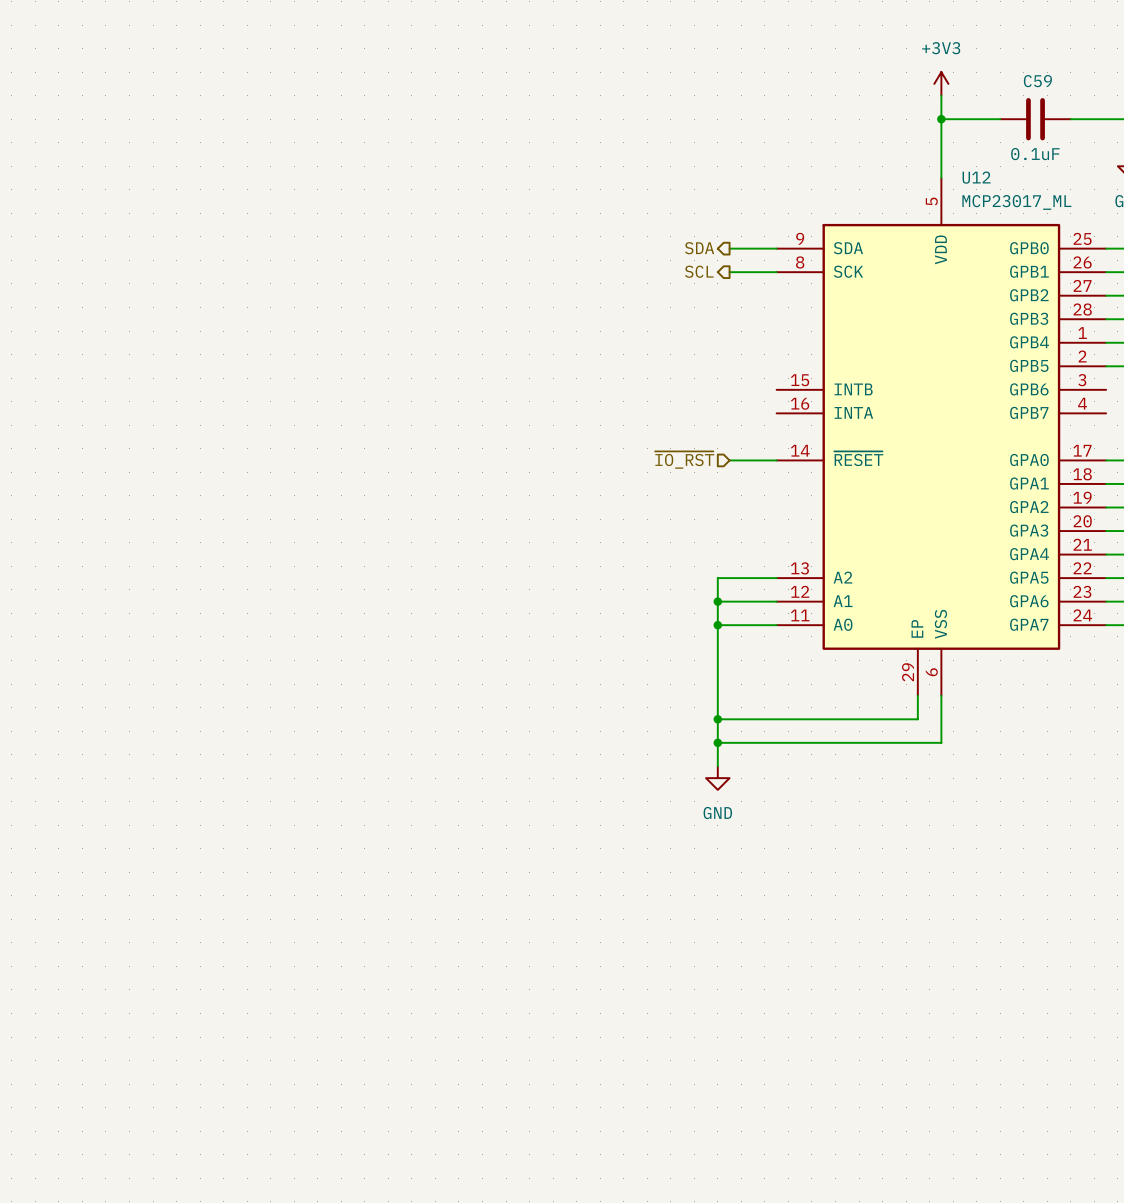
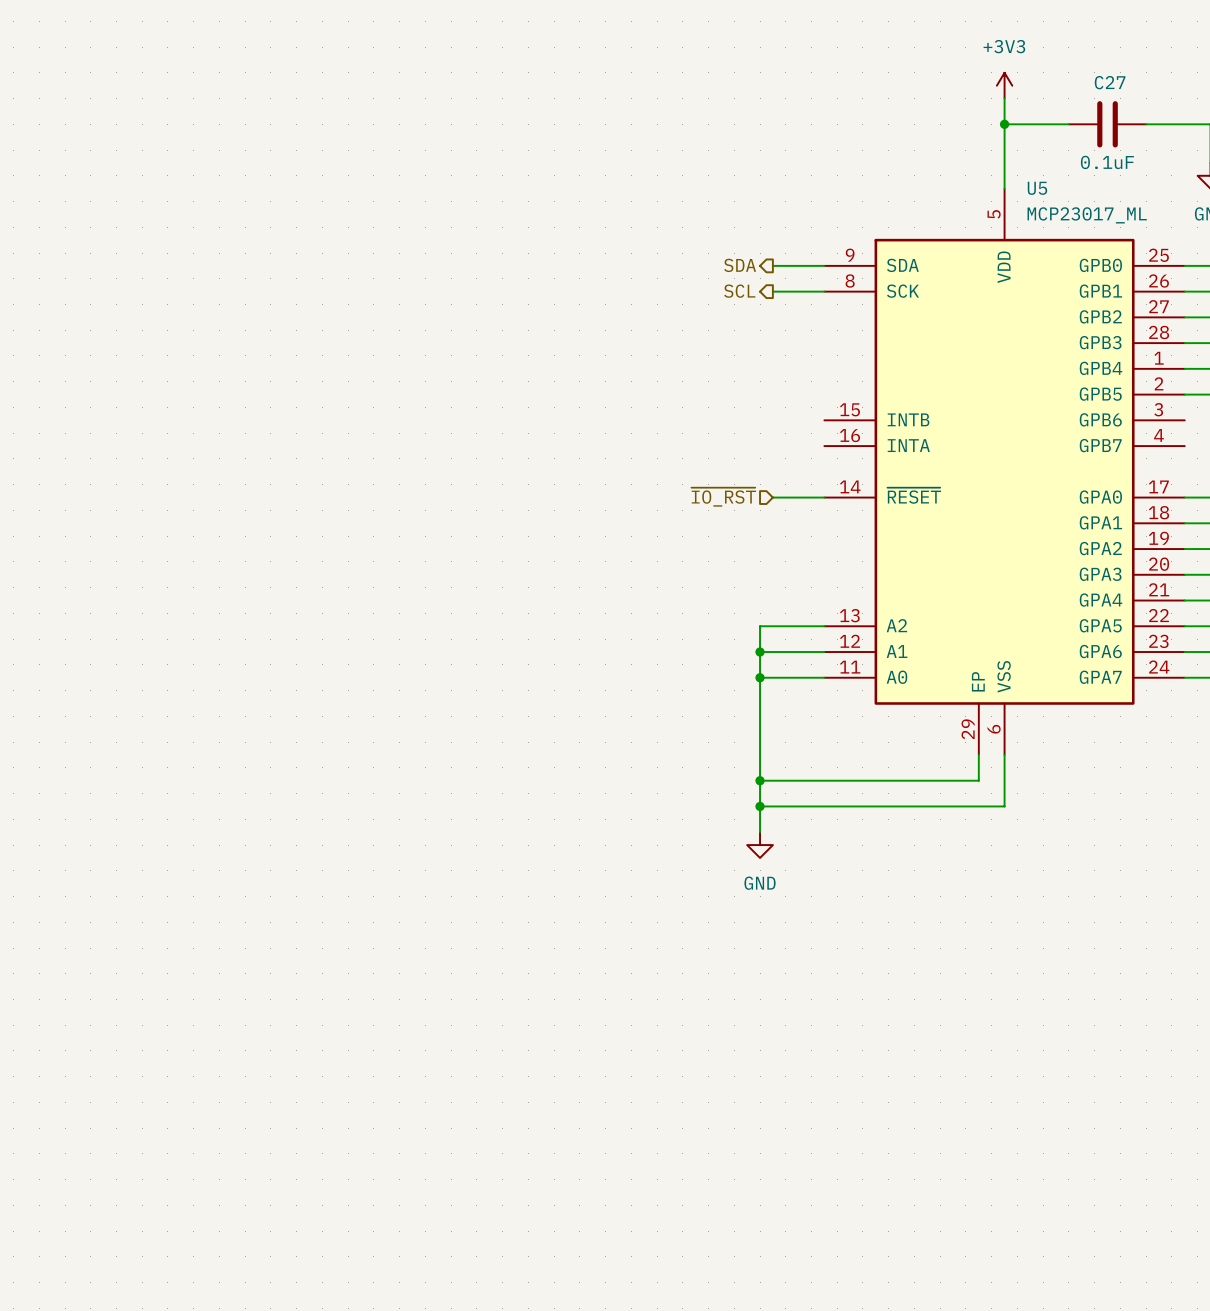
C59 name: C59 (1037, 81) -> C27 (1110, 82)
U12 name: U12 (976, 177) -> U5 (1037, 188)

